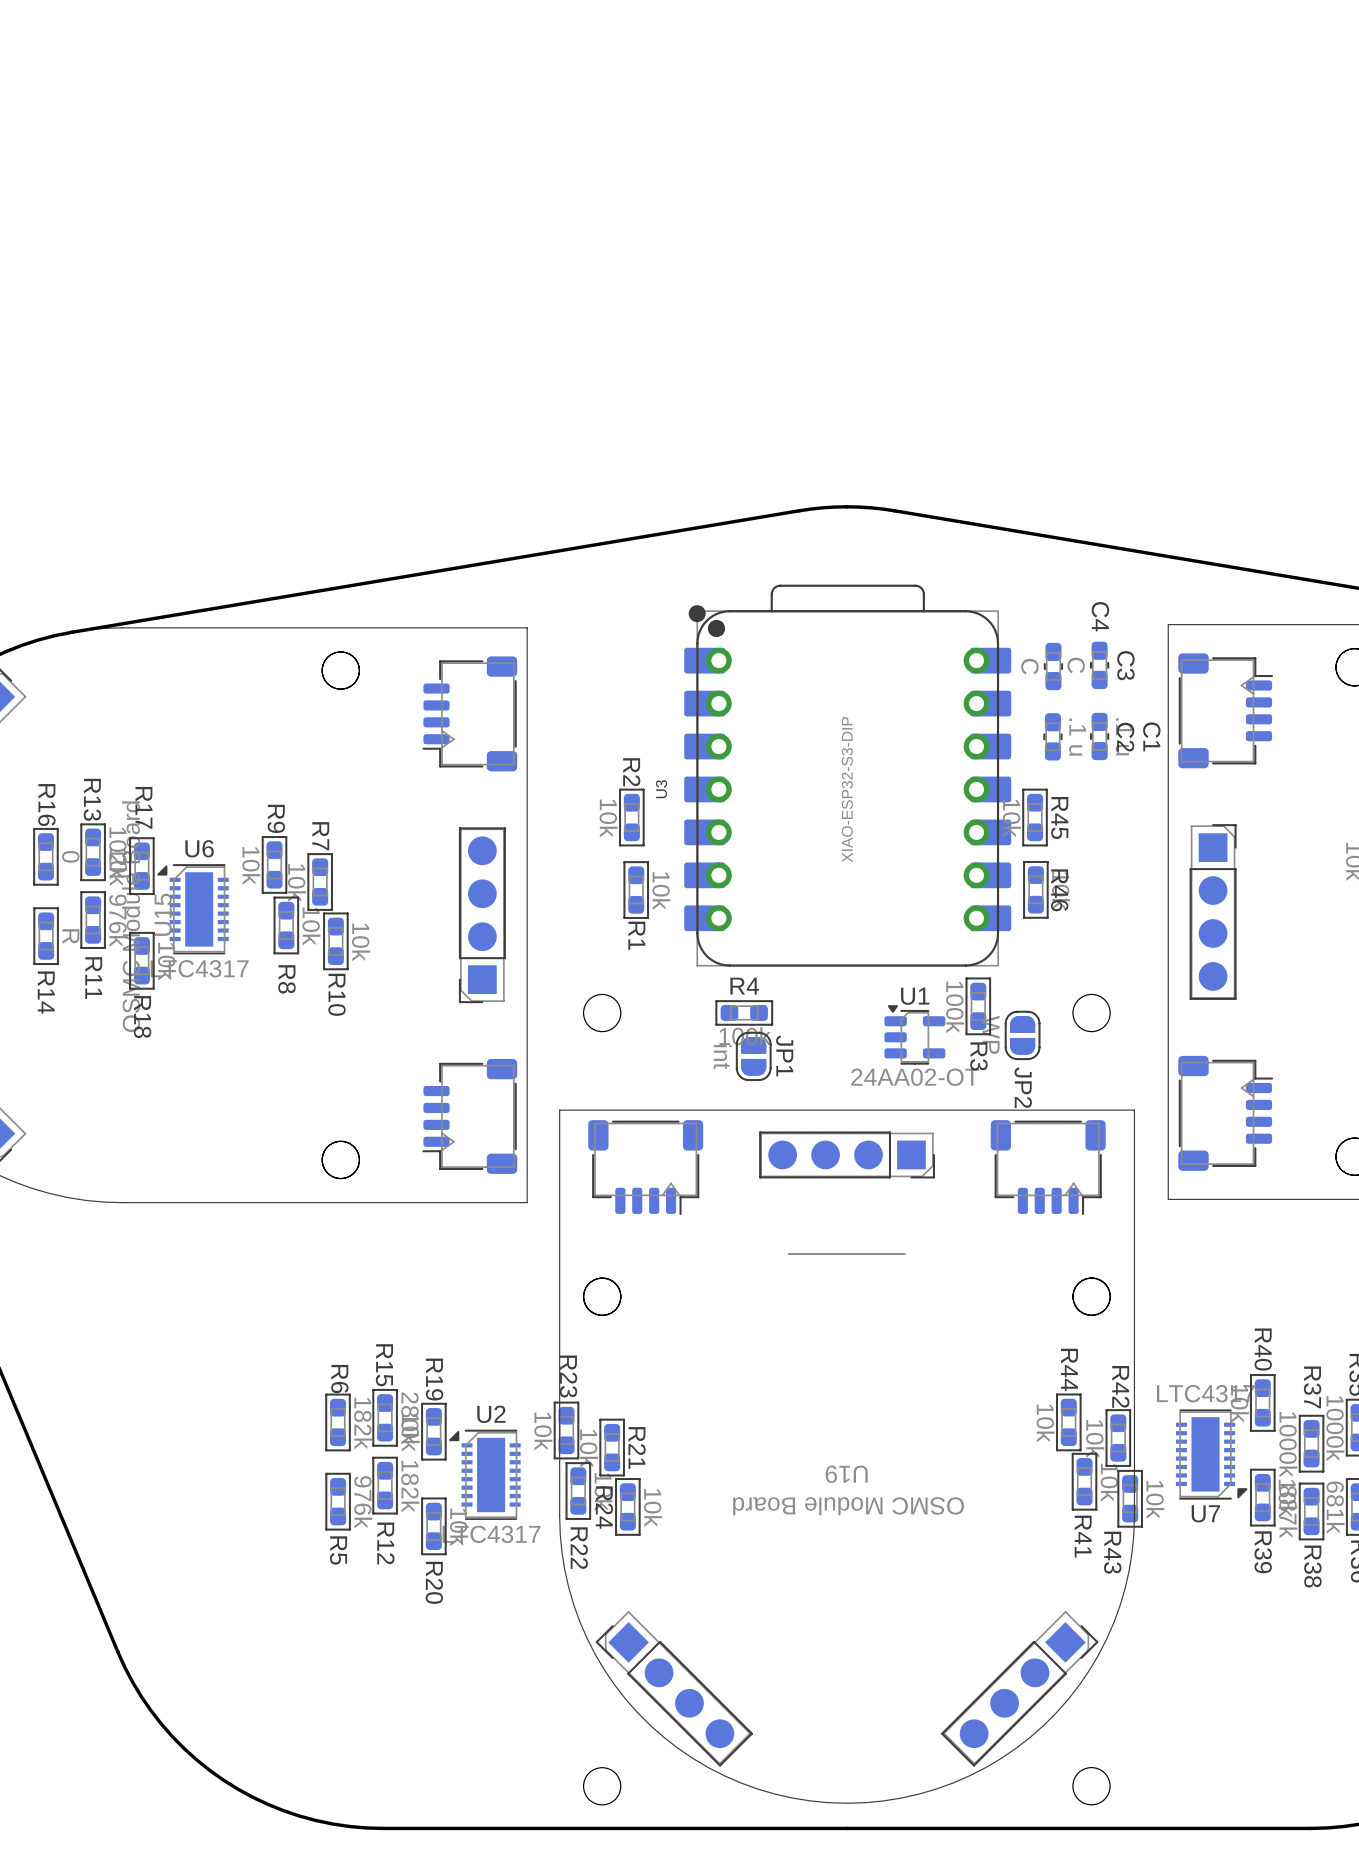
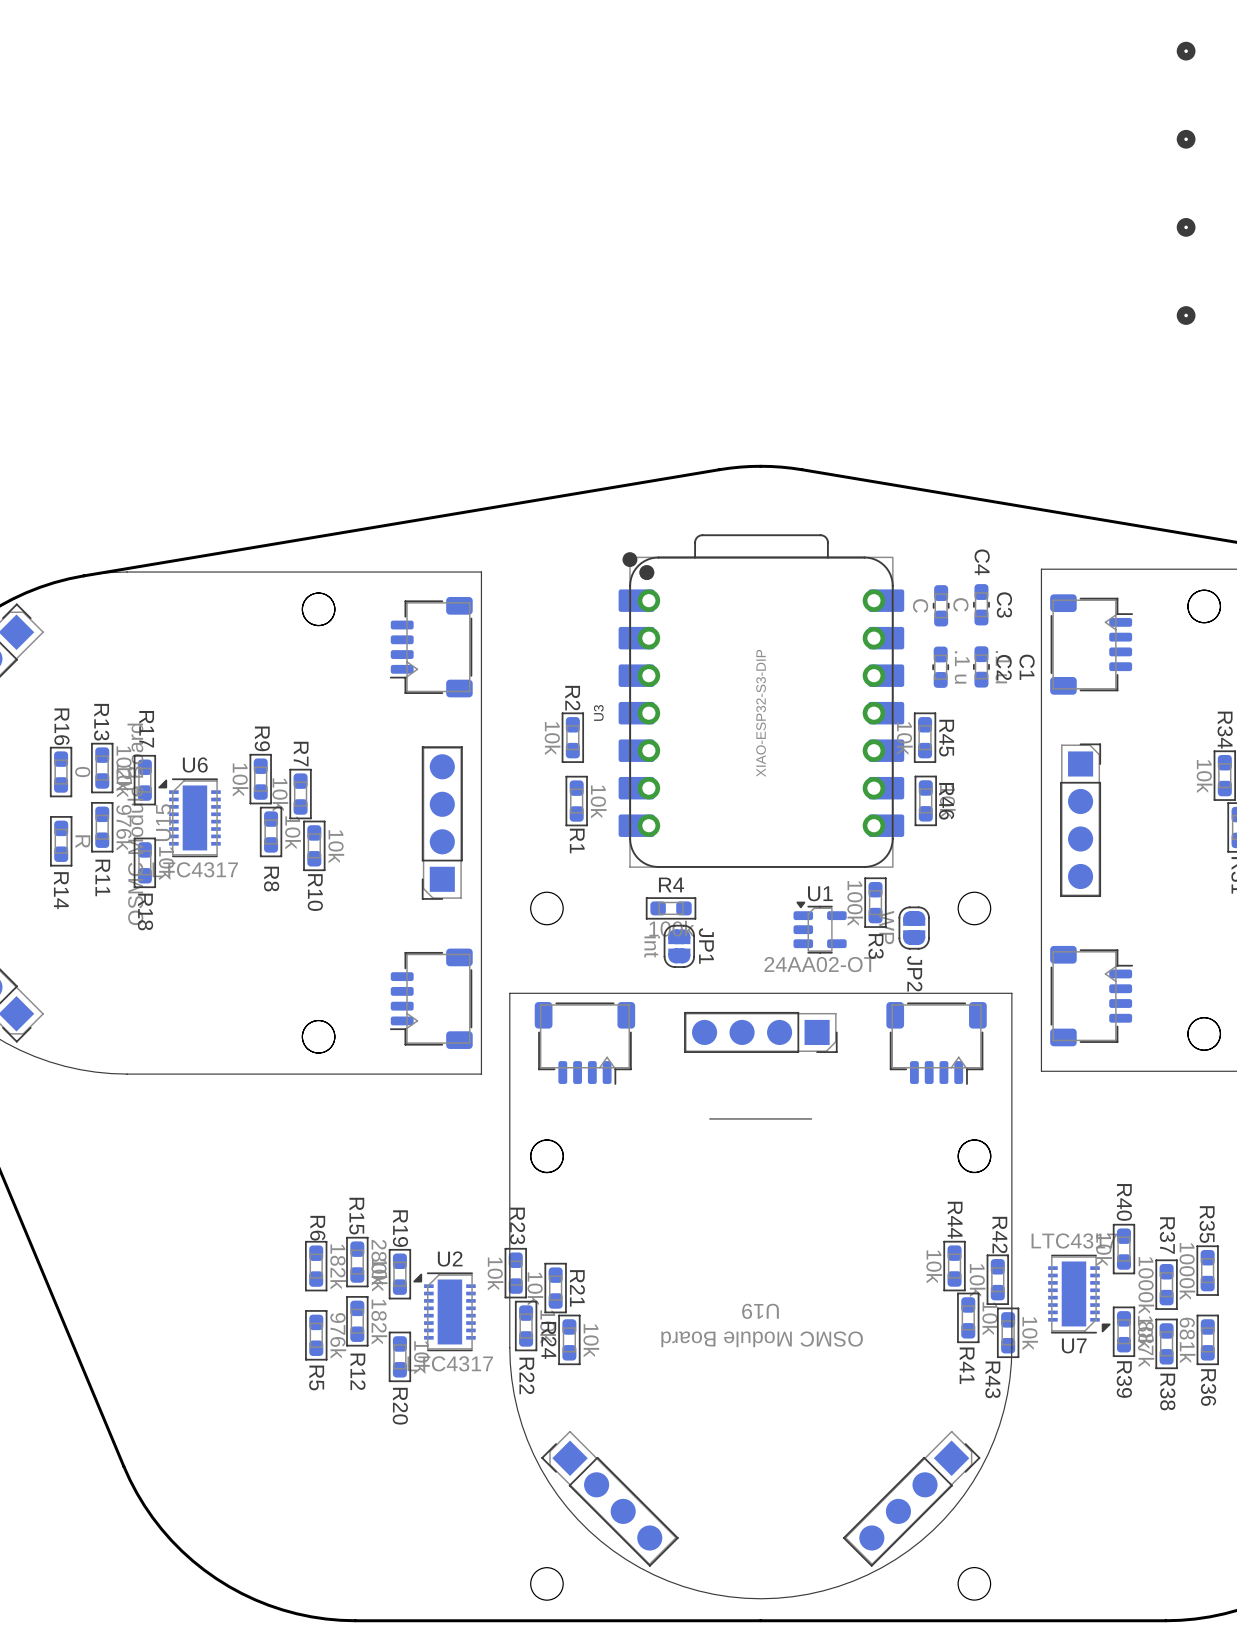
part: none -> (1186, 51)
part: none -> (1186, 139)
part: none -> (1186, 227)
part: none -> (1186, 315)

